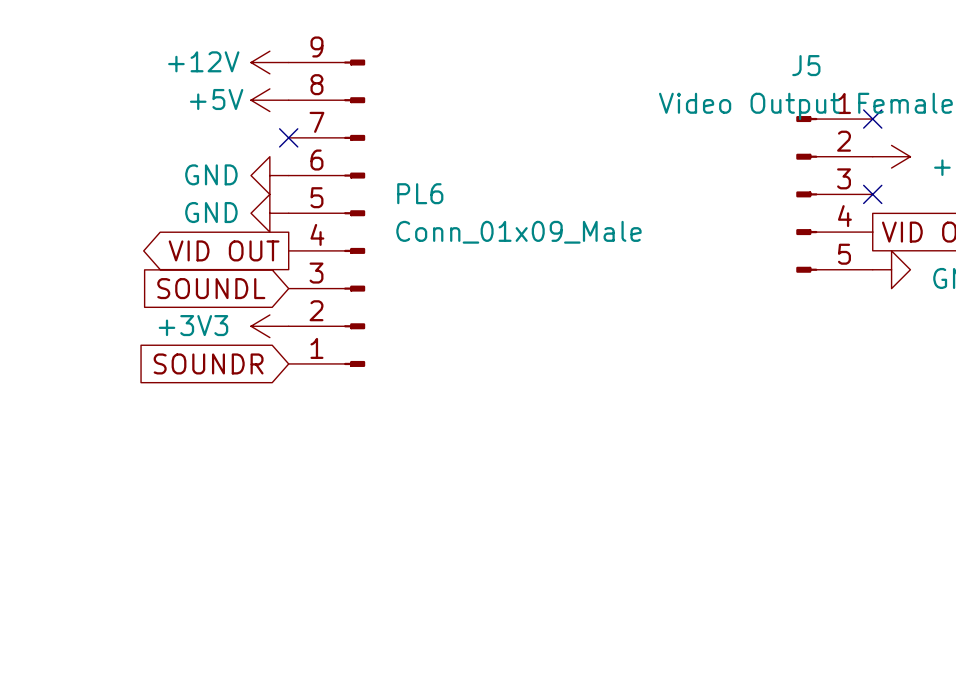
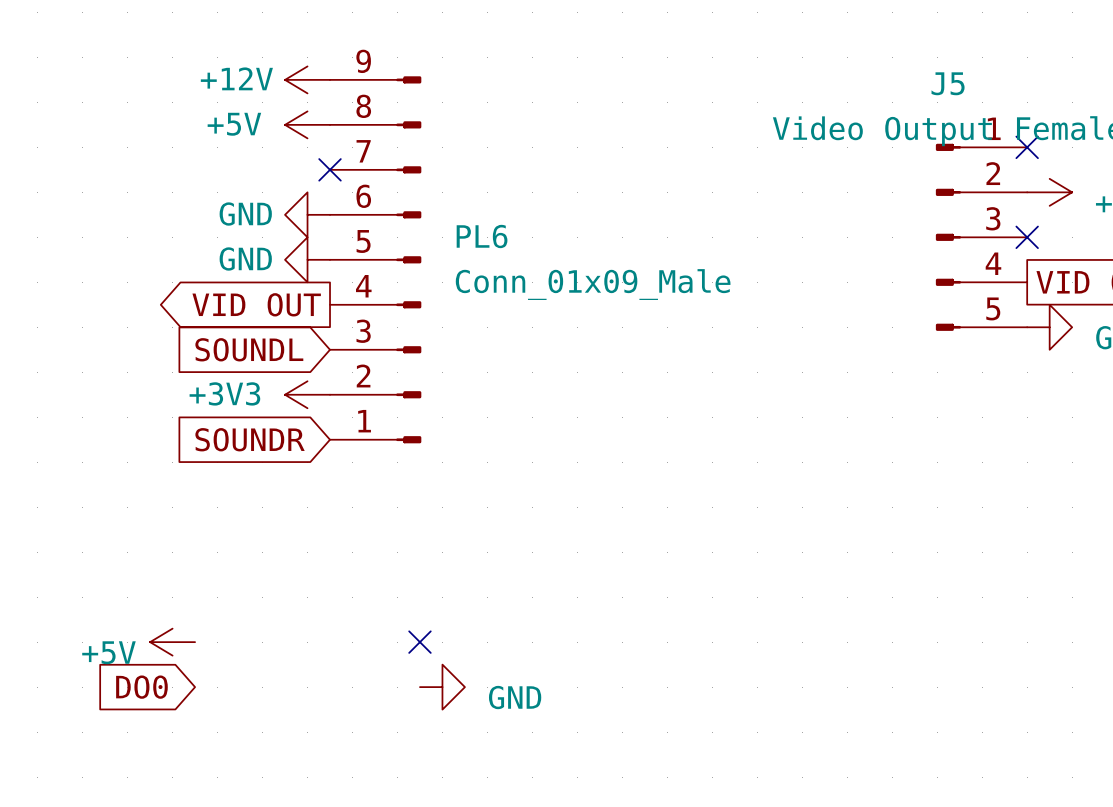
power symbol: none -> +5V (172, 642)
no-connect mark: none -> (419, 642)
global label: none -> DO0 (141, 687)
power symbol: none -> GND (442, 687)

